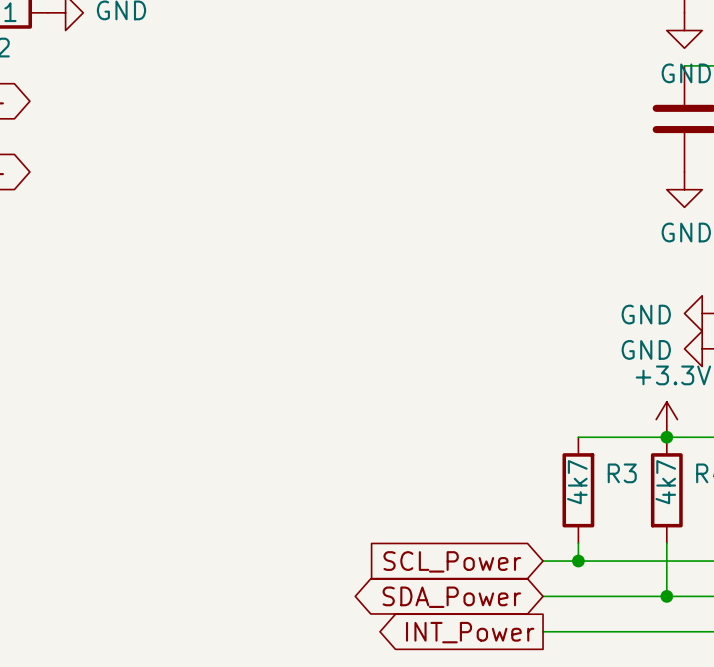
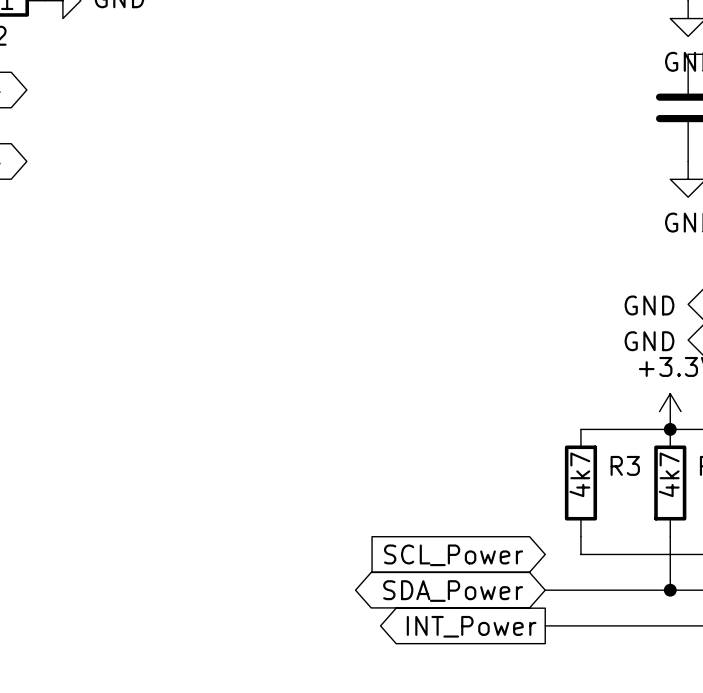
wire: (543, 561) (578, 561) -> none
junction: (578, 561) -> none

